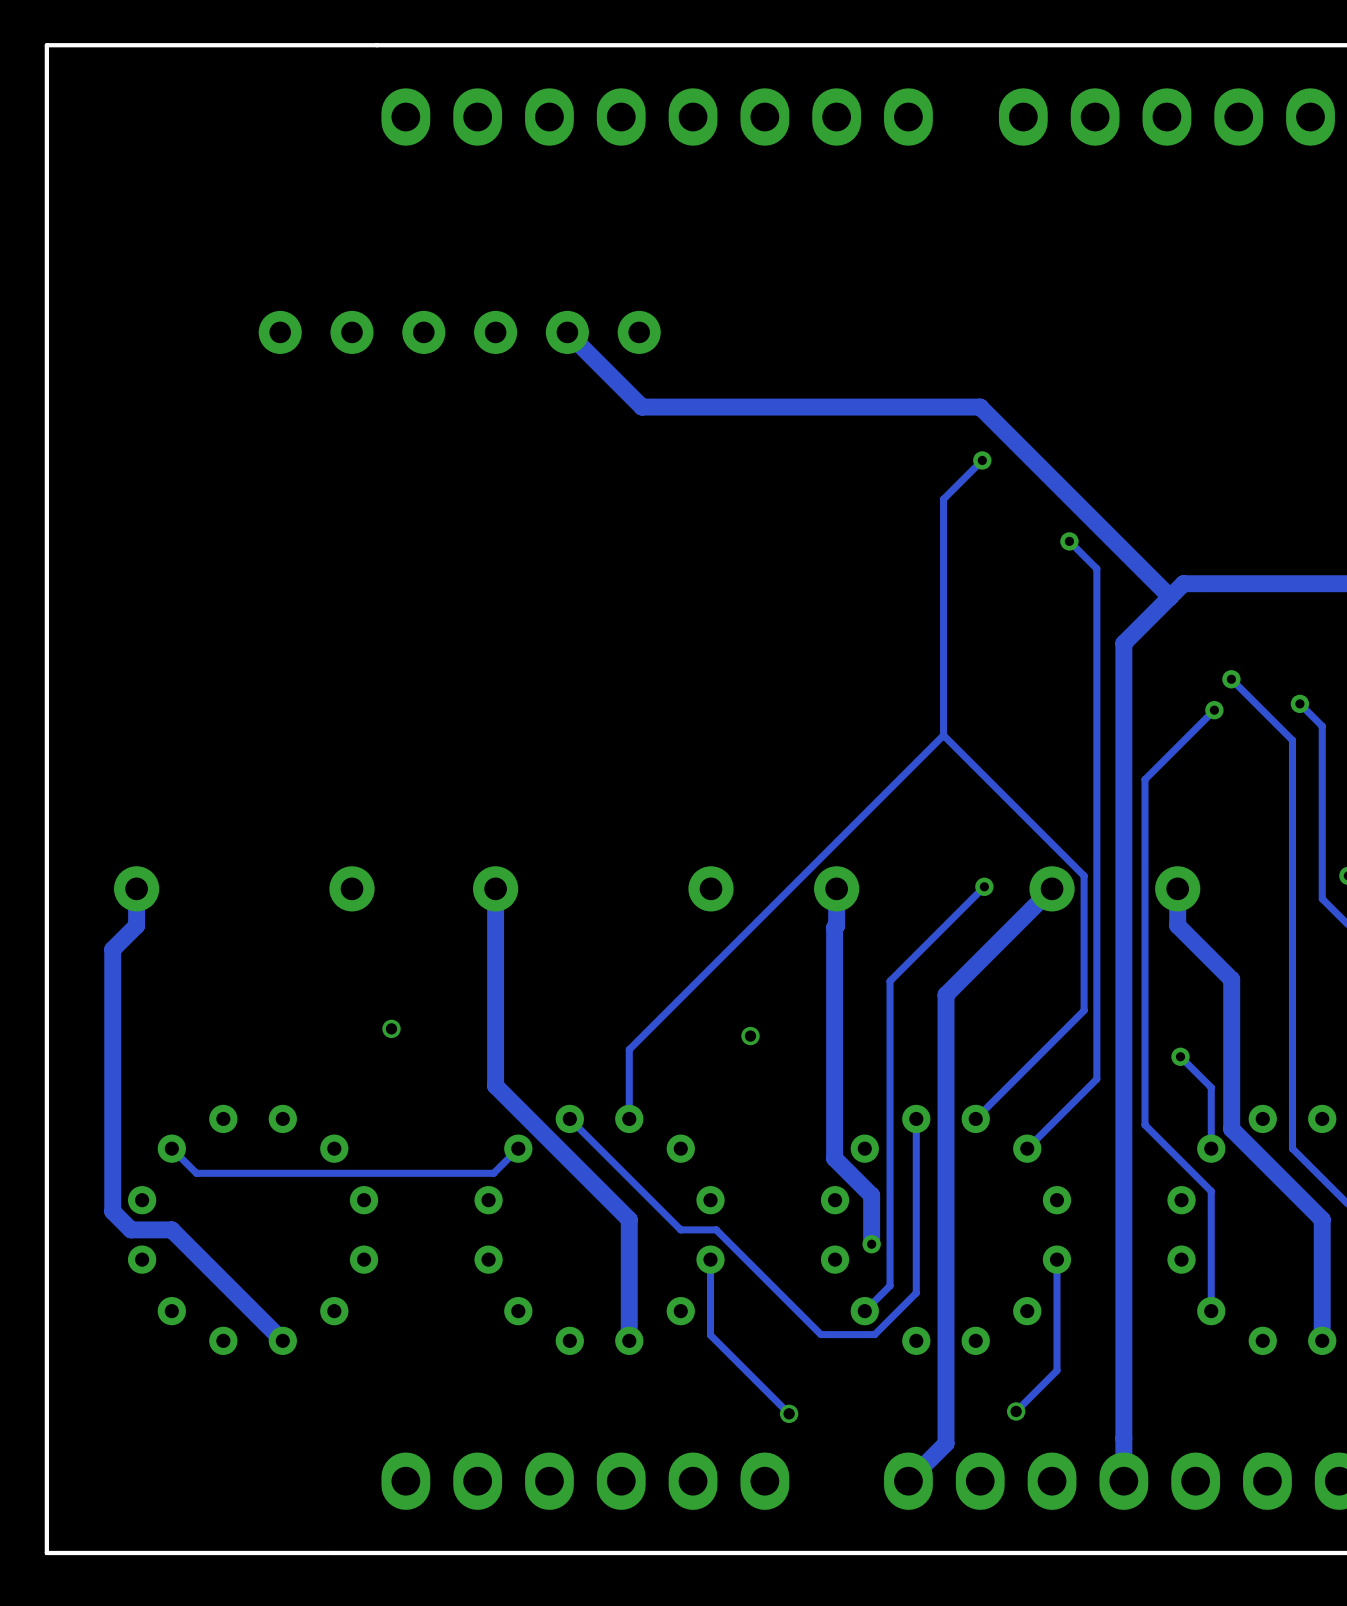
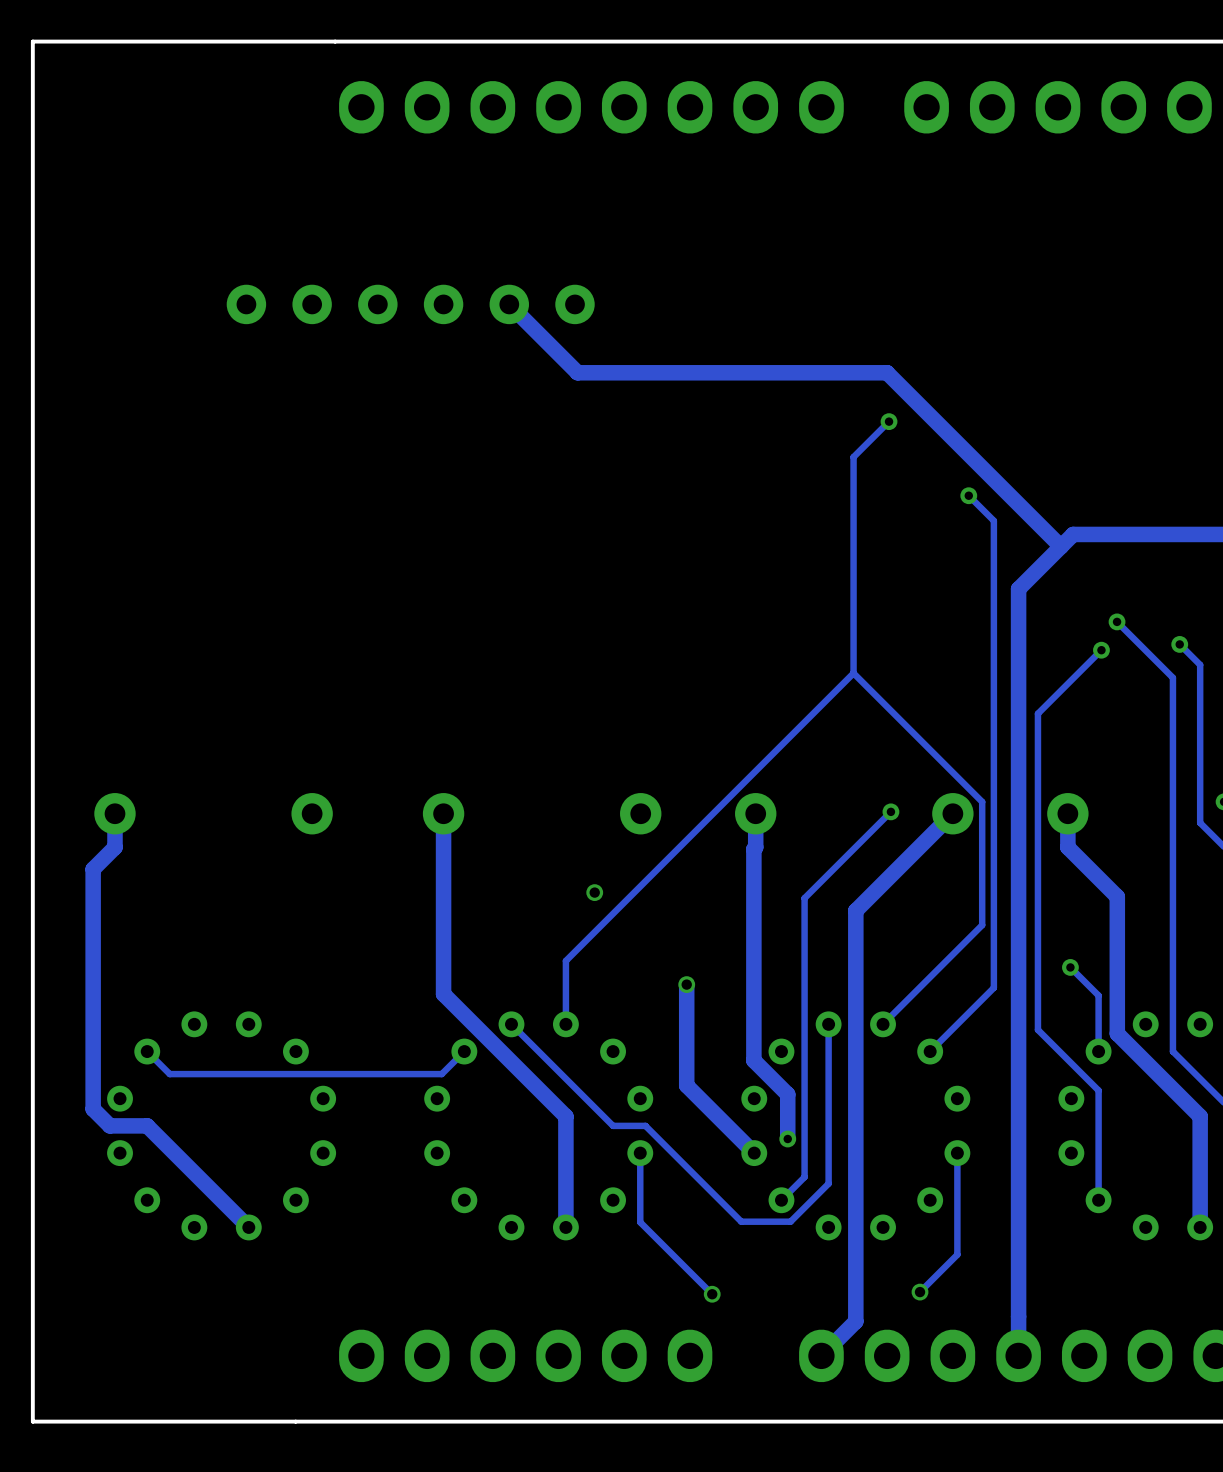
via: none -> (594, 892)
via: (391, 1028) -> none
via position: (750, 1036) -> (686, 984)
track: none -> (686, 984) (686, 1085) (754, 1153)

